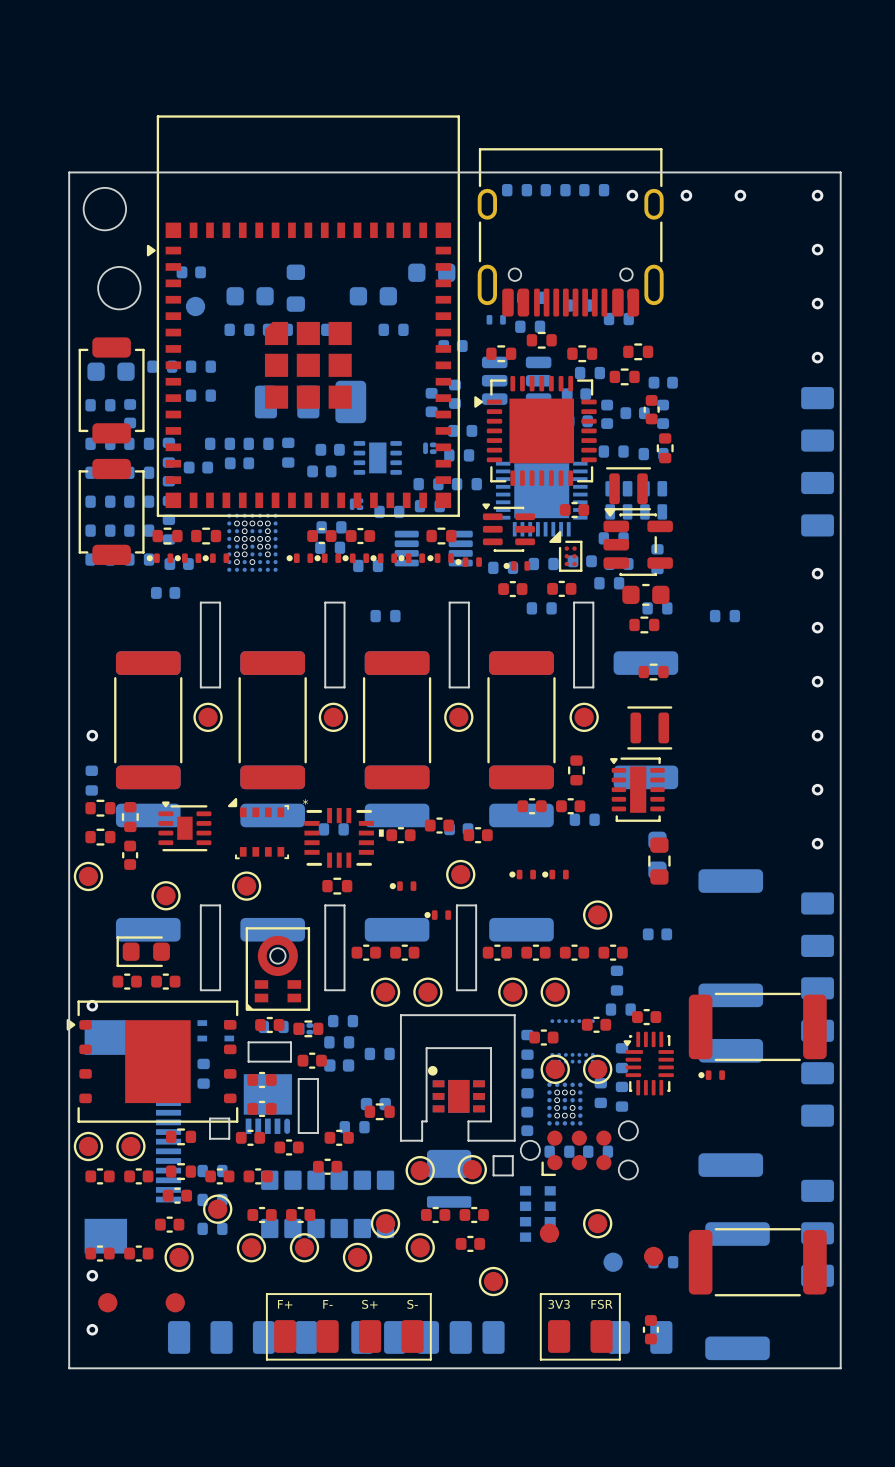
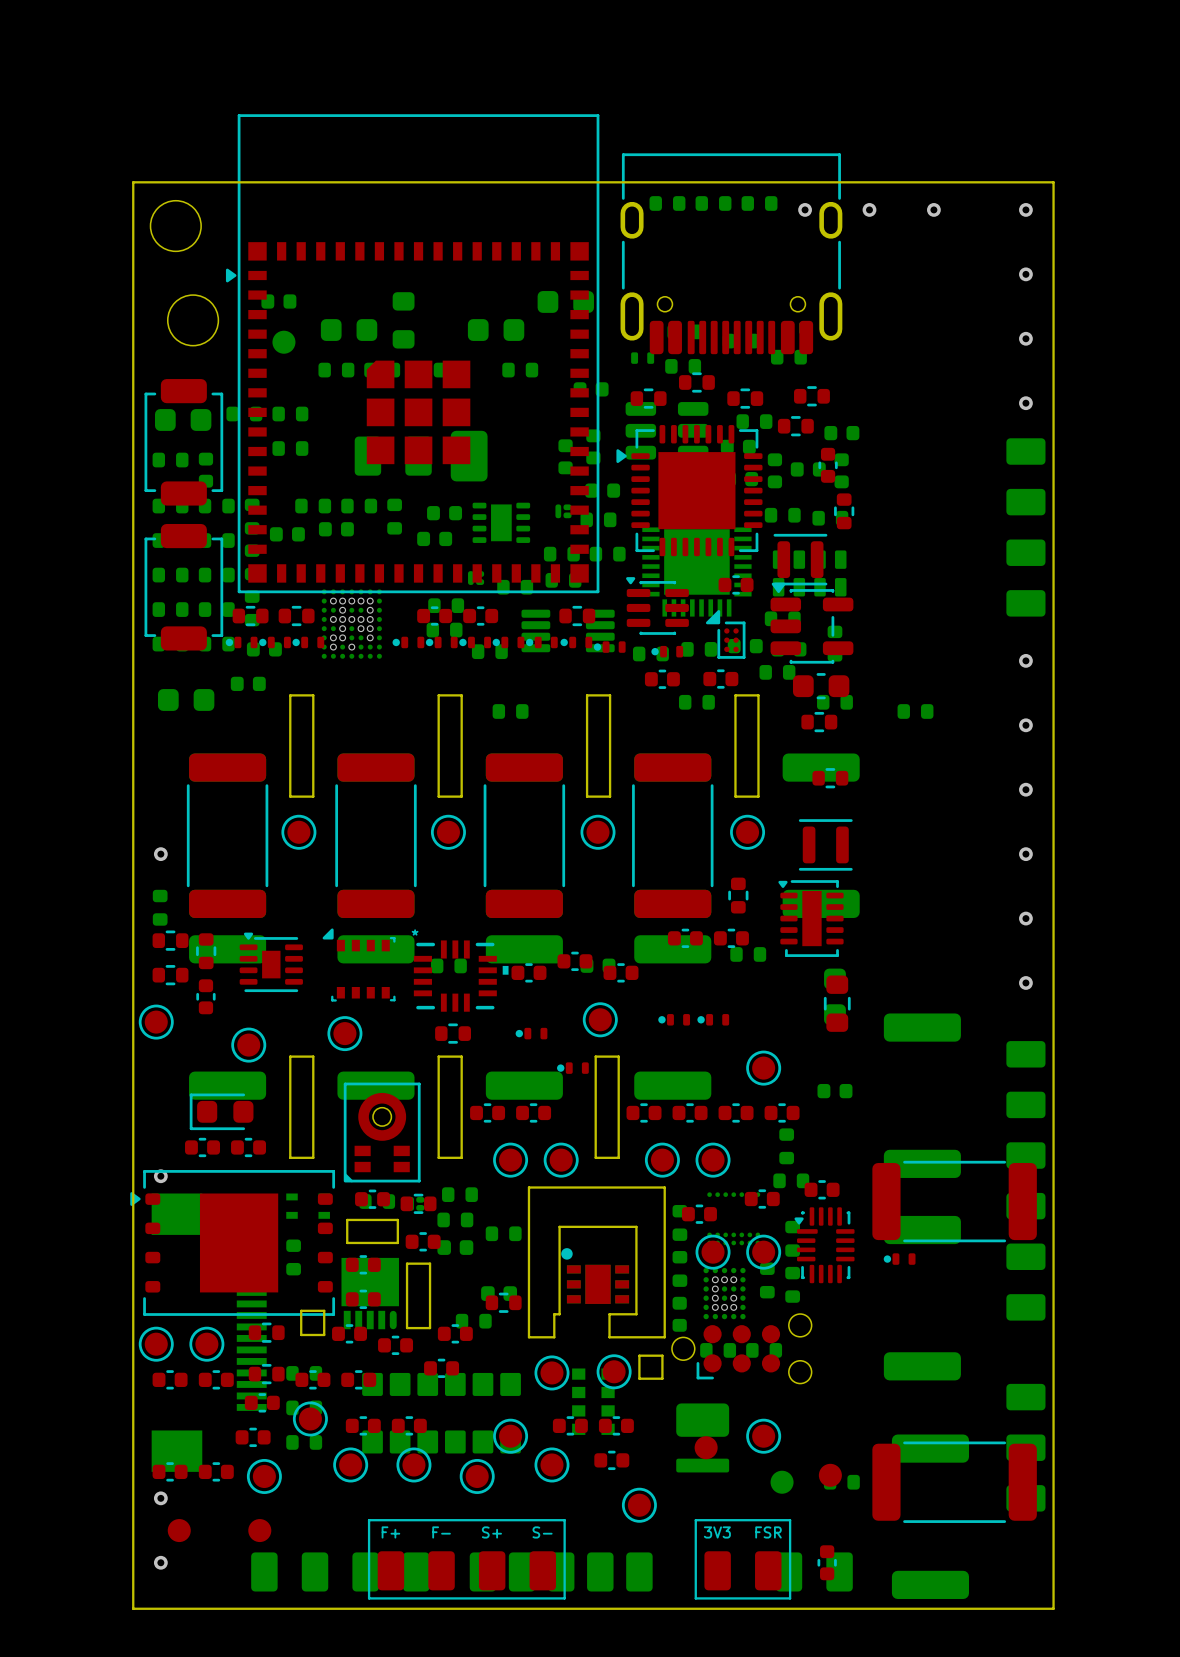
part: none -> (186, 699)
part footprint: [426, 1149, 472, 1208] -> [572, 1368, 615, 1435]
part footprint: [520, 1186, 556, 1242] -> [676, 1403, 730, 1473]

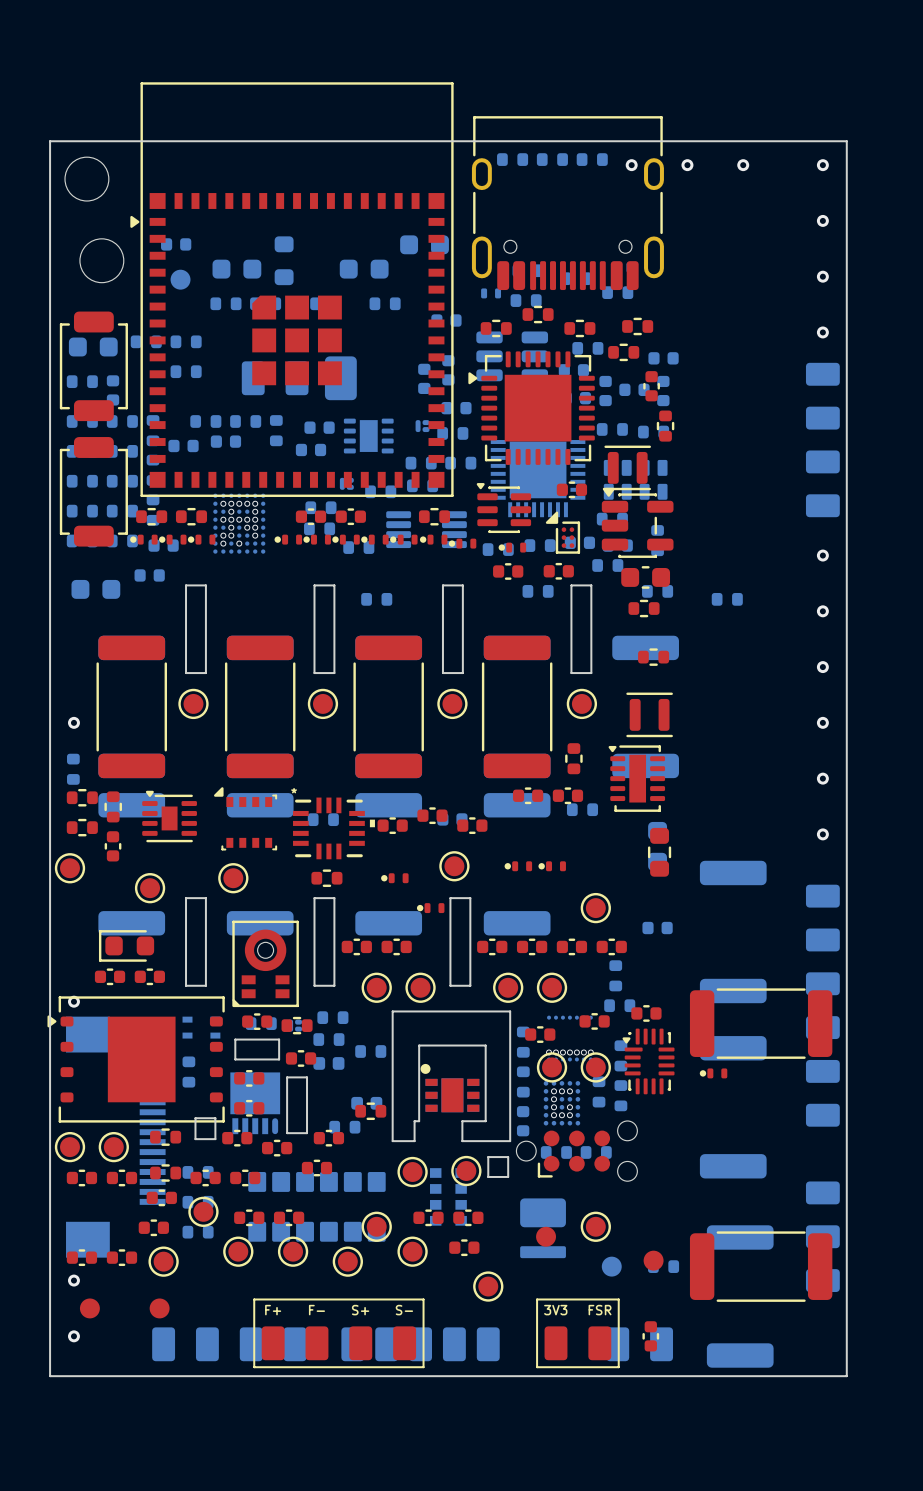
via: none -> (549, 1052)
via: none -> (555, 1052)
via: none -> (562, 1052)
via: none -> (569, 1052)
via: none -> (576, 1052)
via: none -> (583, 1052)
via: none -> (590, 1052)

